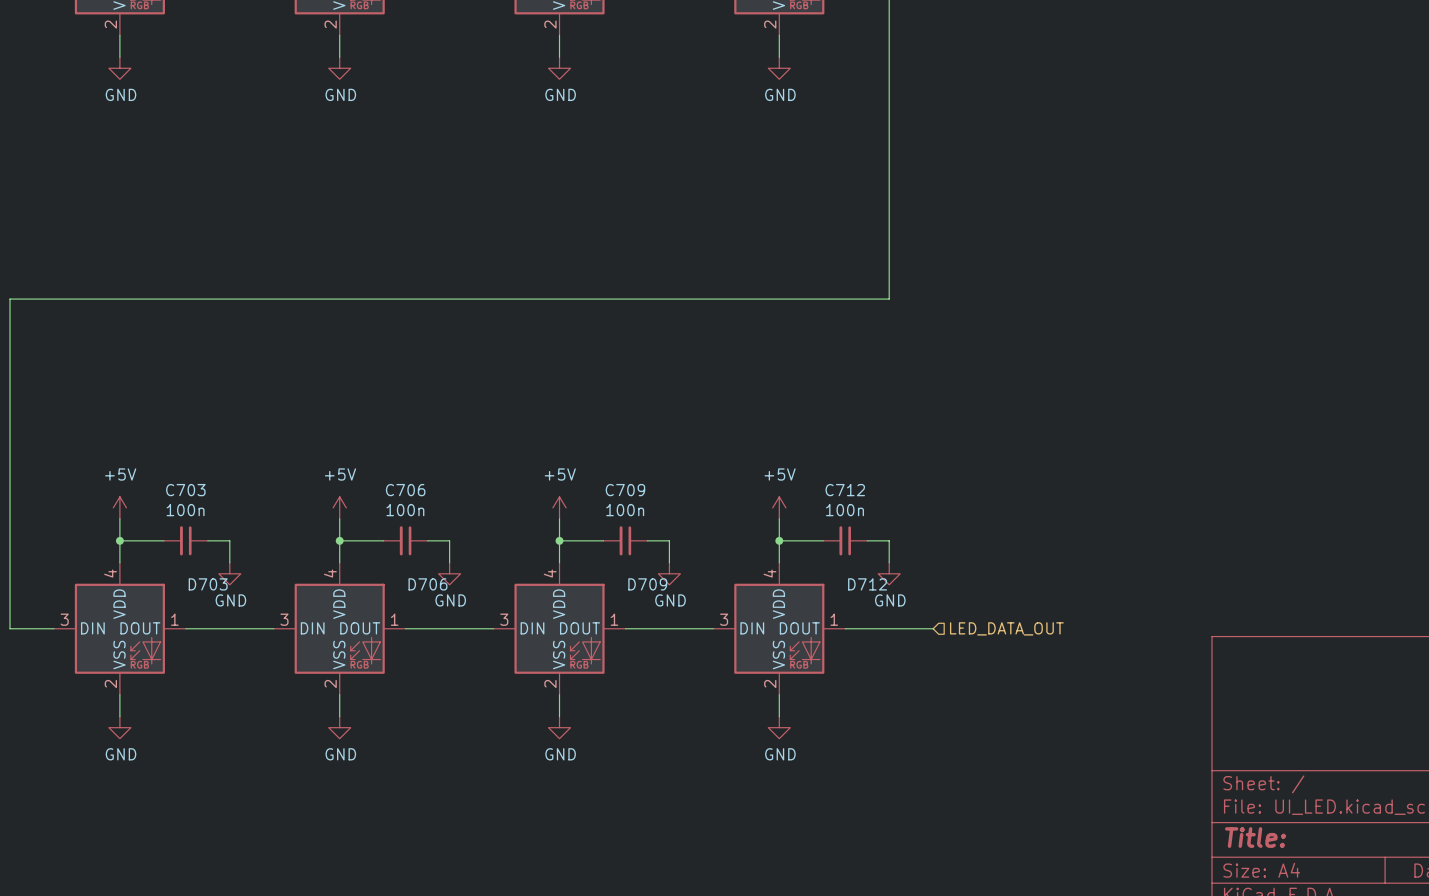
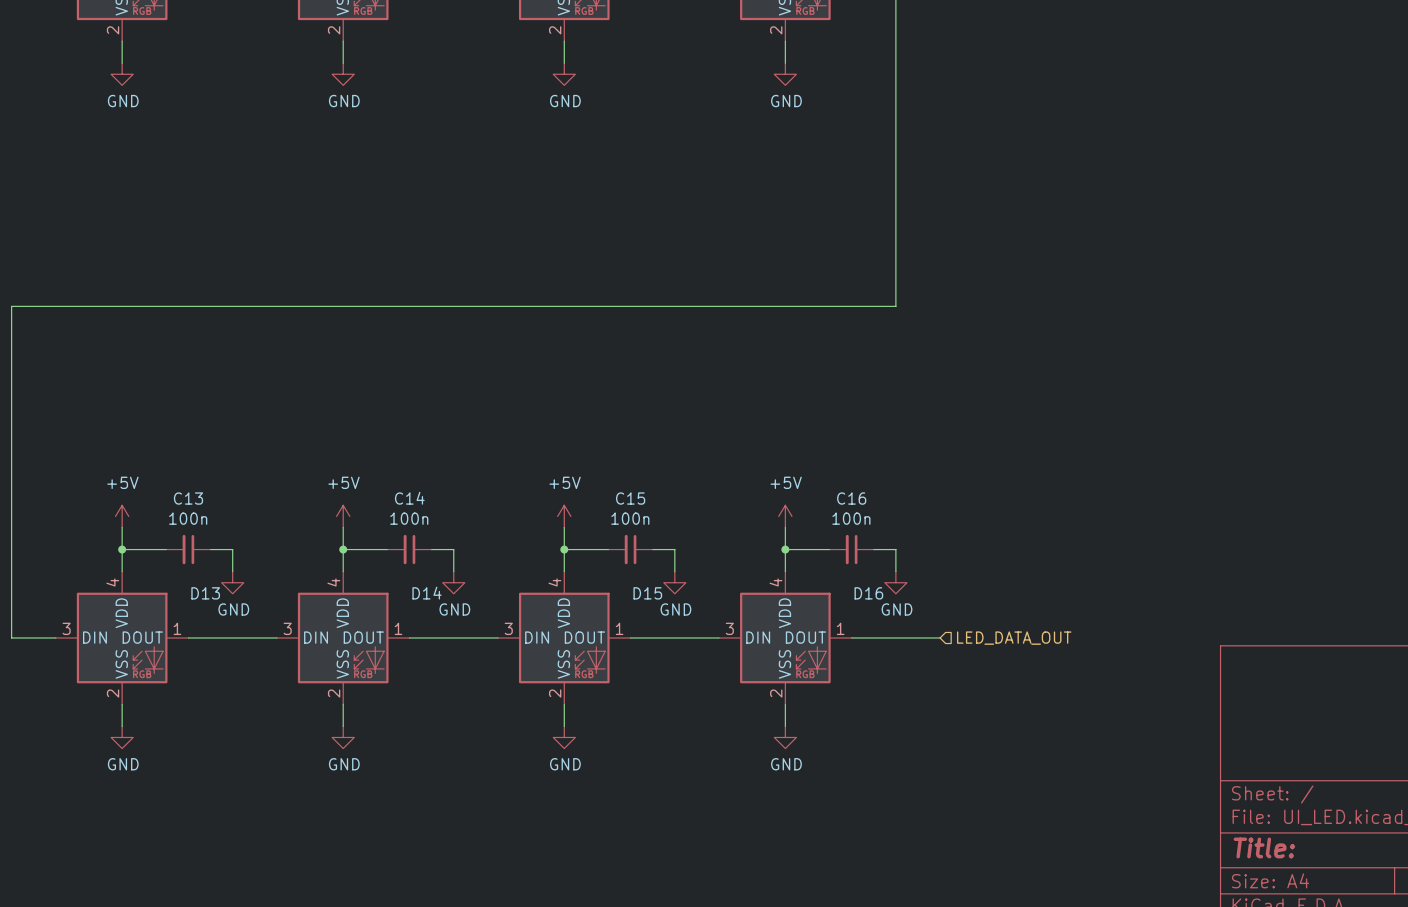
C703 name: C703 (185, 490) -> C13 (188, 498)
C706 name: C706 (405, 490) -> C14 (409, 498)
C709 name: C709 (625, 490) -> C15 (630, 498)
C712 name: C712 (845, 490) -> C16 (851, 498)
D703 name: D703 (208, 584) -> D13 (205, 593)
D706 name: D706 (427, 584) -> D14 (426, 593)
D709 name: D709 (647, 584) -> D15 (647, 593)
D712 name: D712 (867, 584) -> D16 (868, 593)

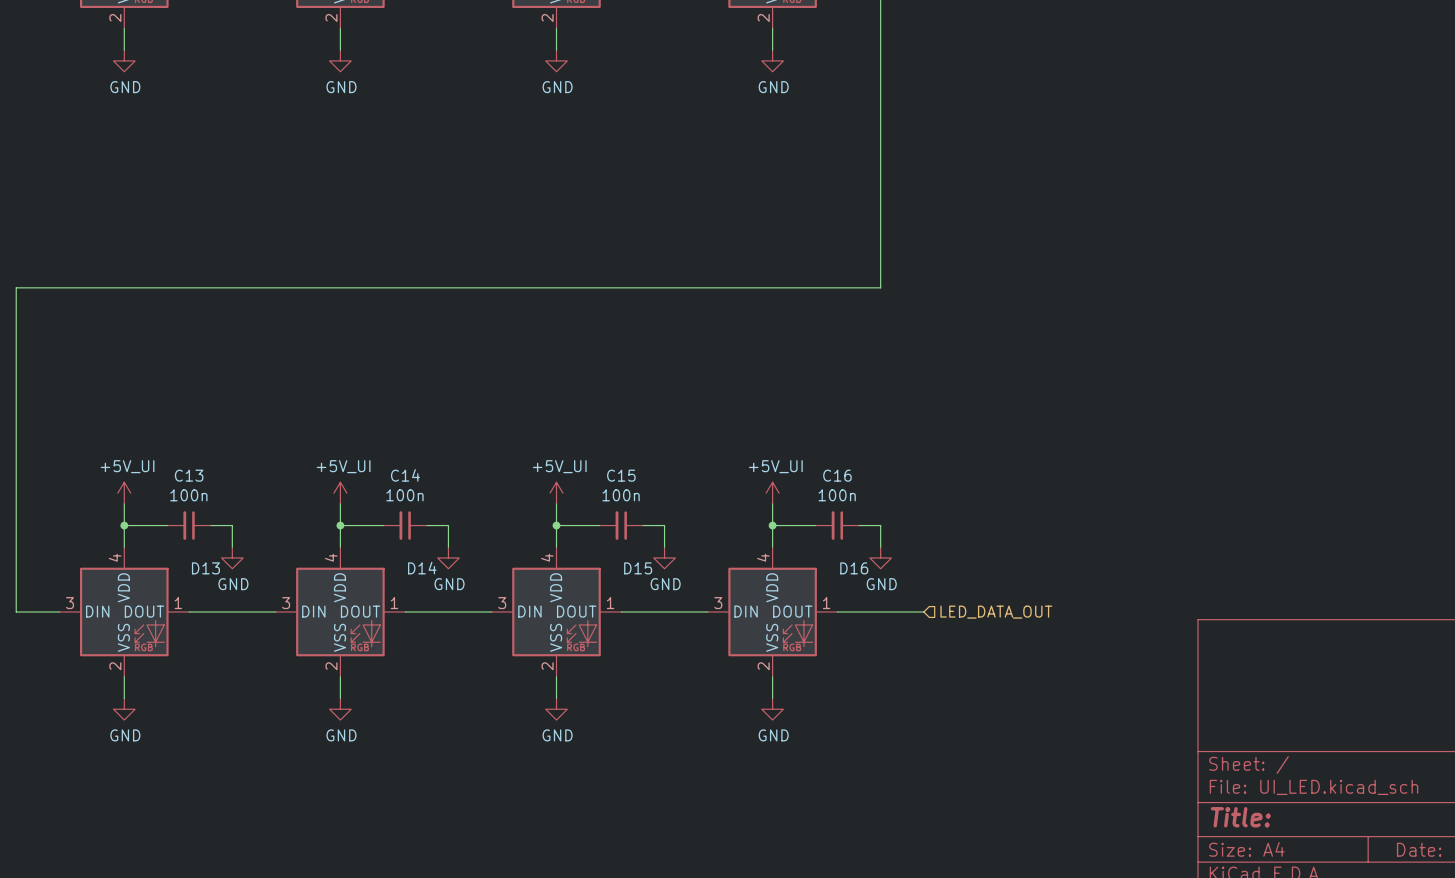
power symbol: +5V (122, 516) -> +5V_UI (124, 493)
power symbol: +5V (343, 516) -> +5V_UI (340, 493)
power symbol: +5V (564, 516) -> +5V_UI (556, 493)
power symbol: +5V (785, 516) -> +5V_UI (772, 493)

